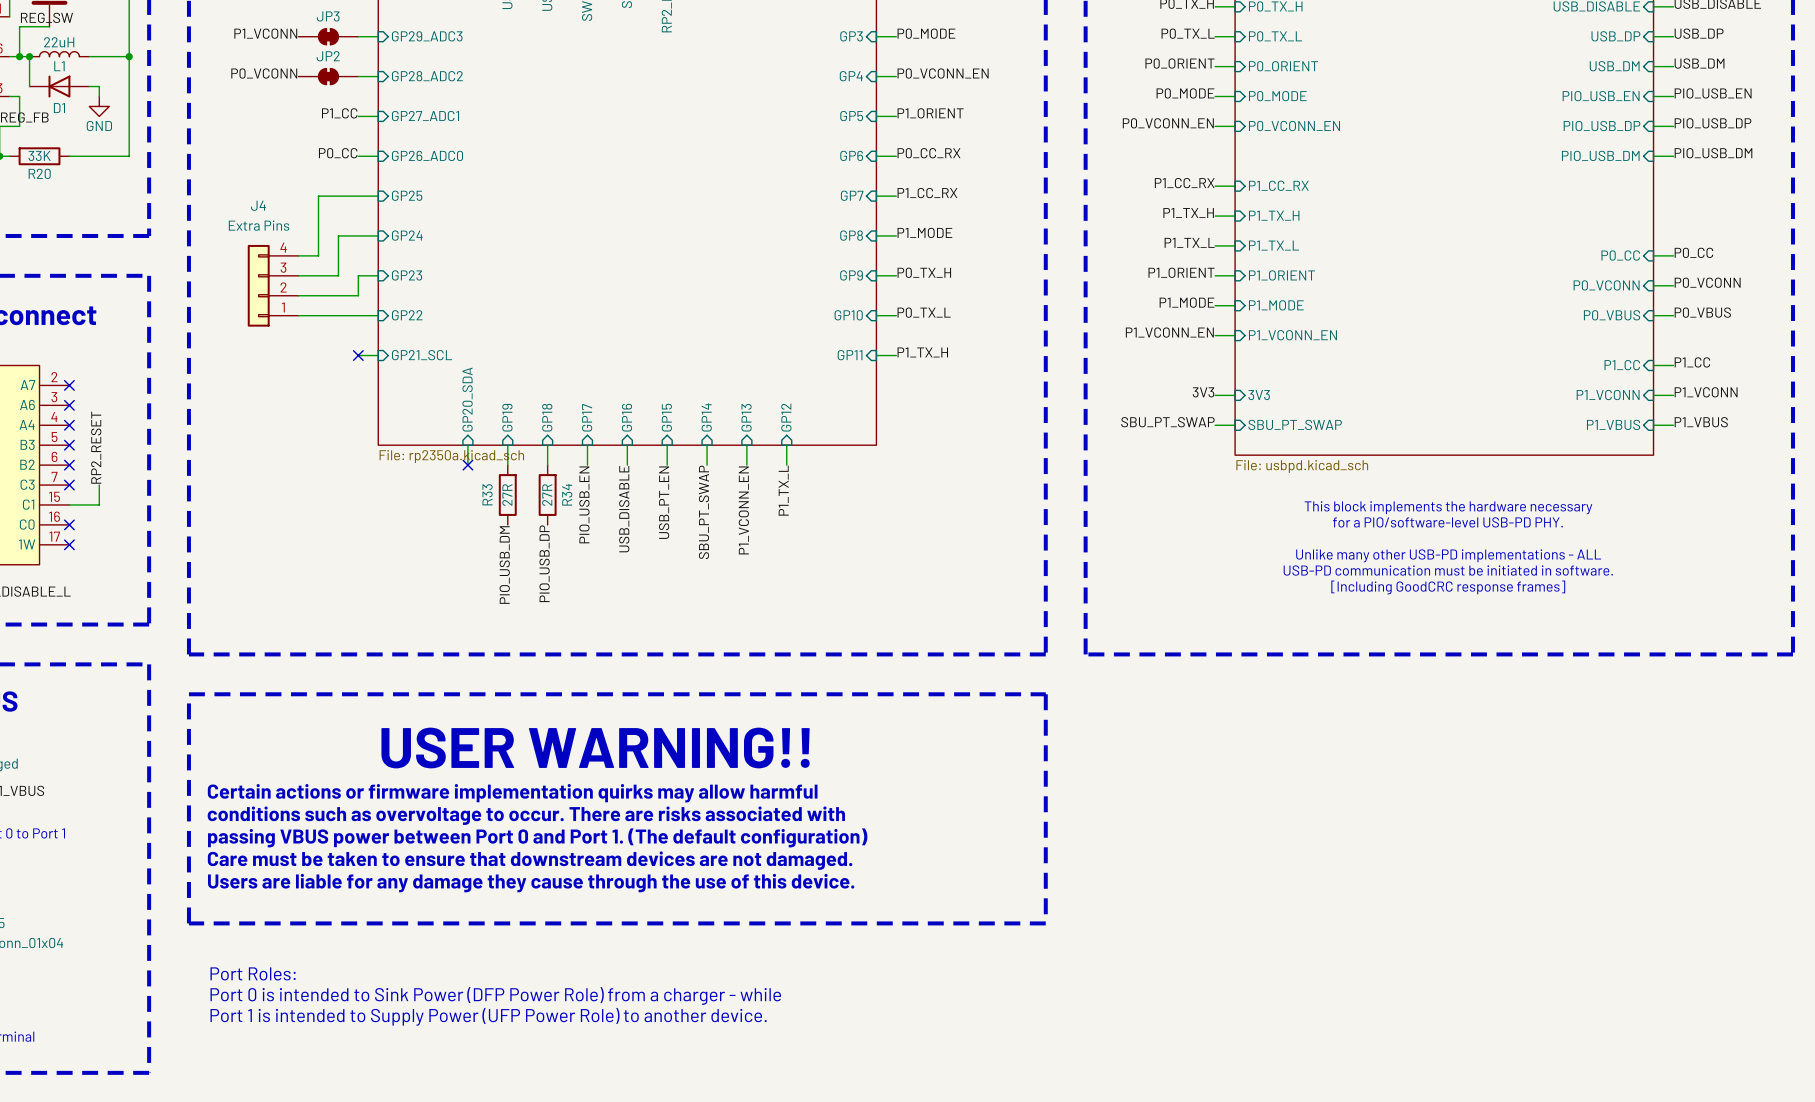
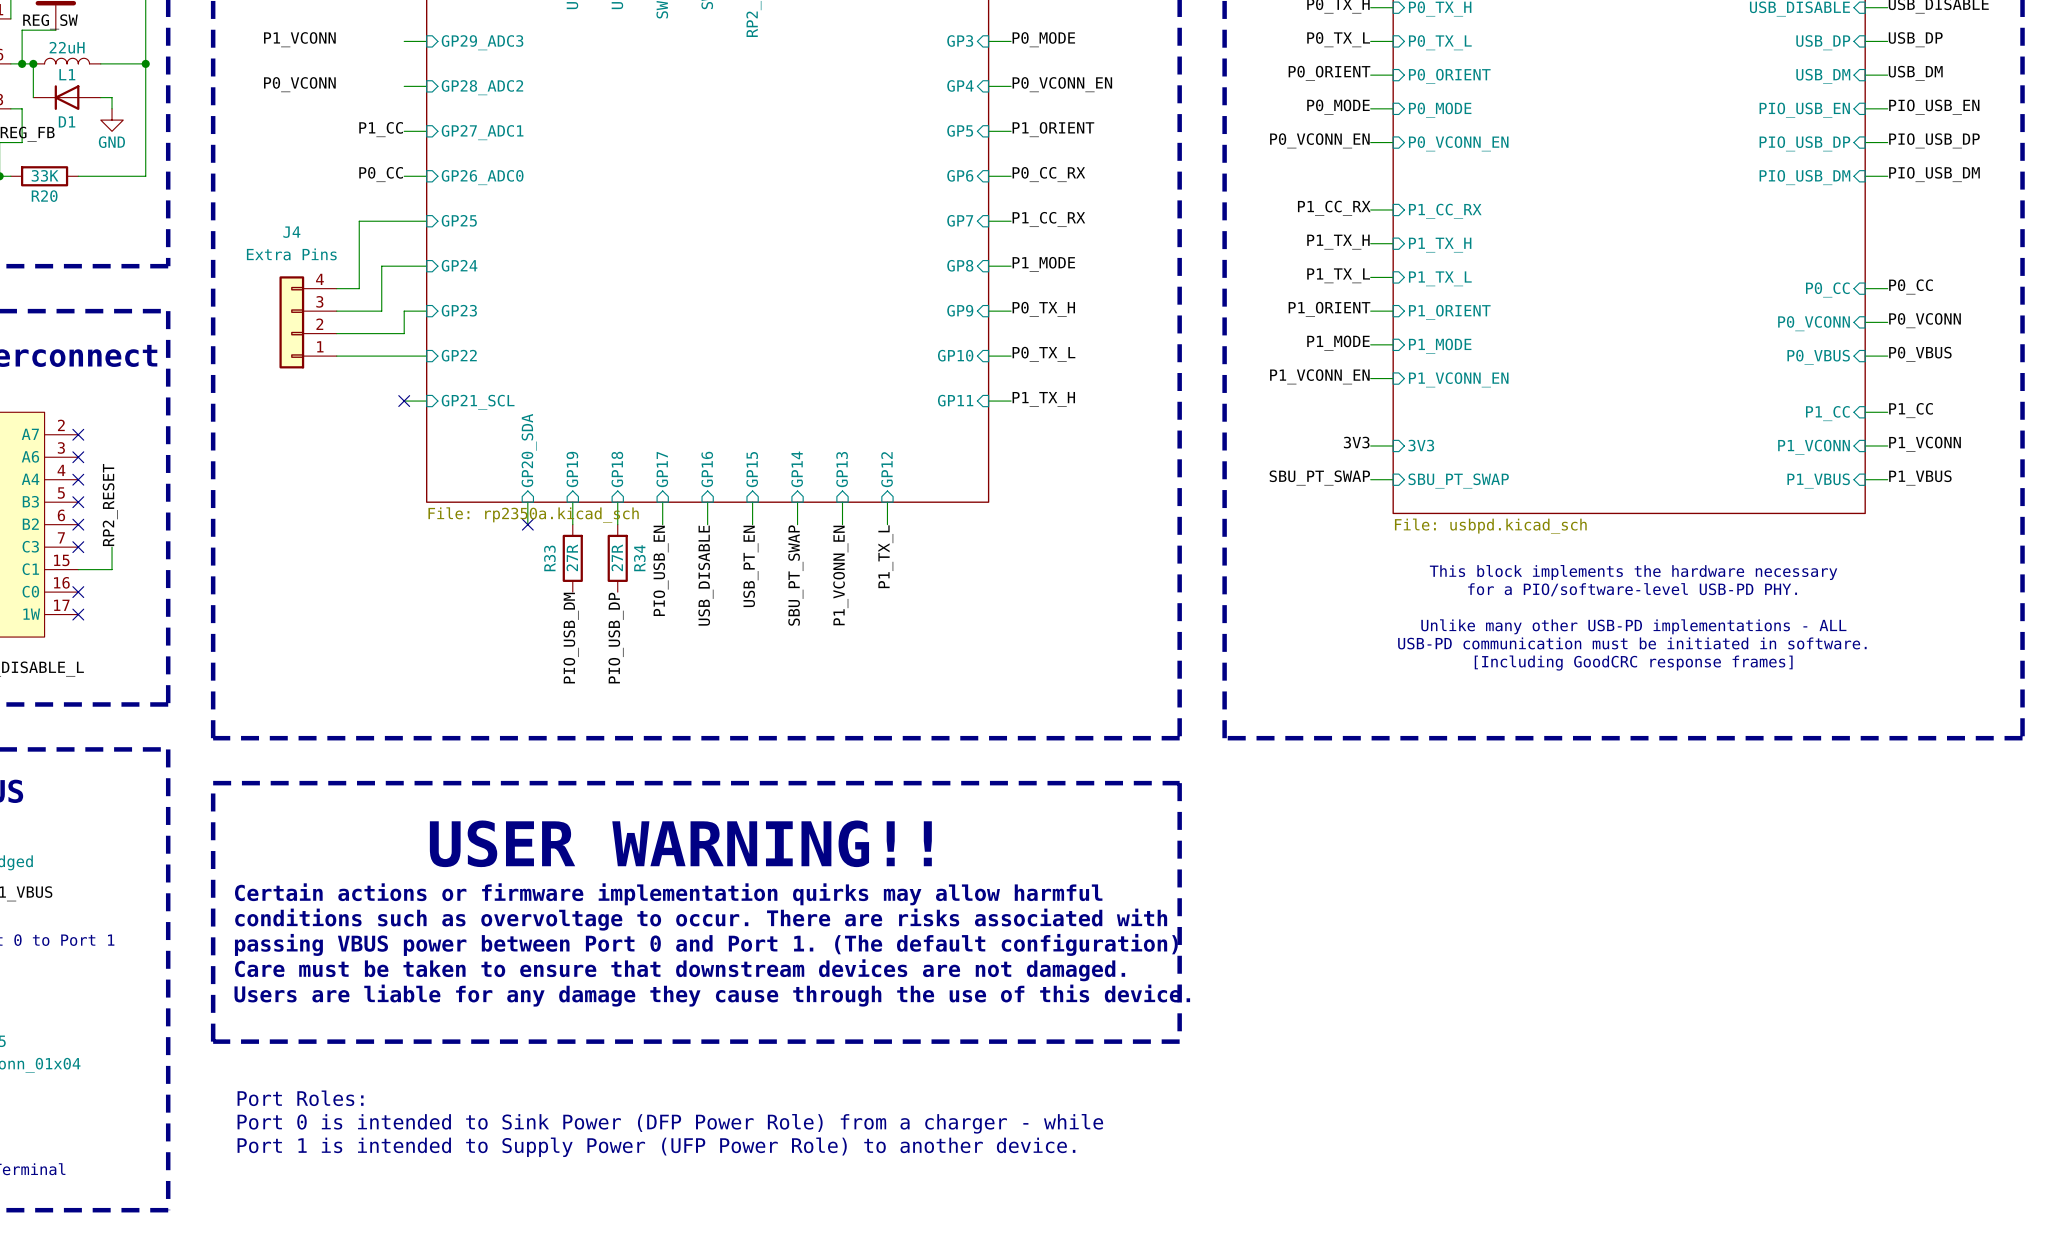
JP3: (328, 36) -> none
JP2: (328, 76) -> none

